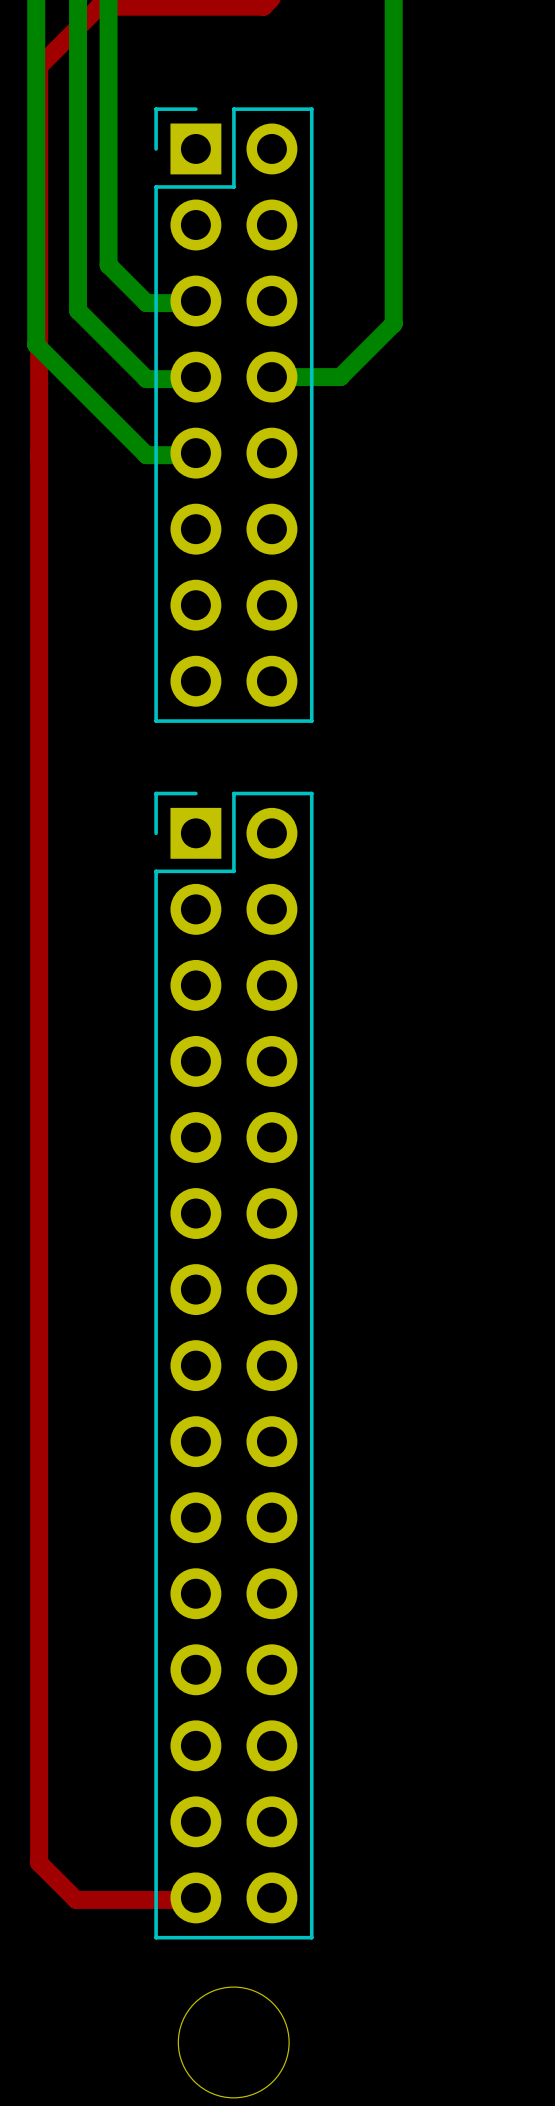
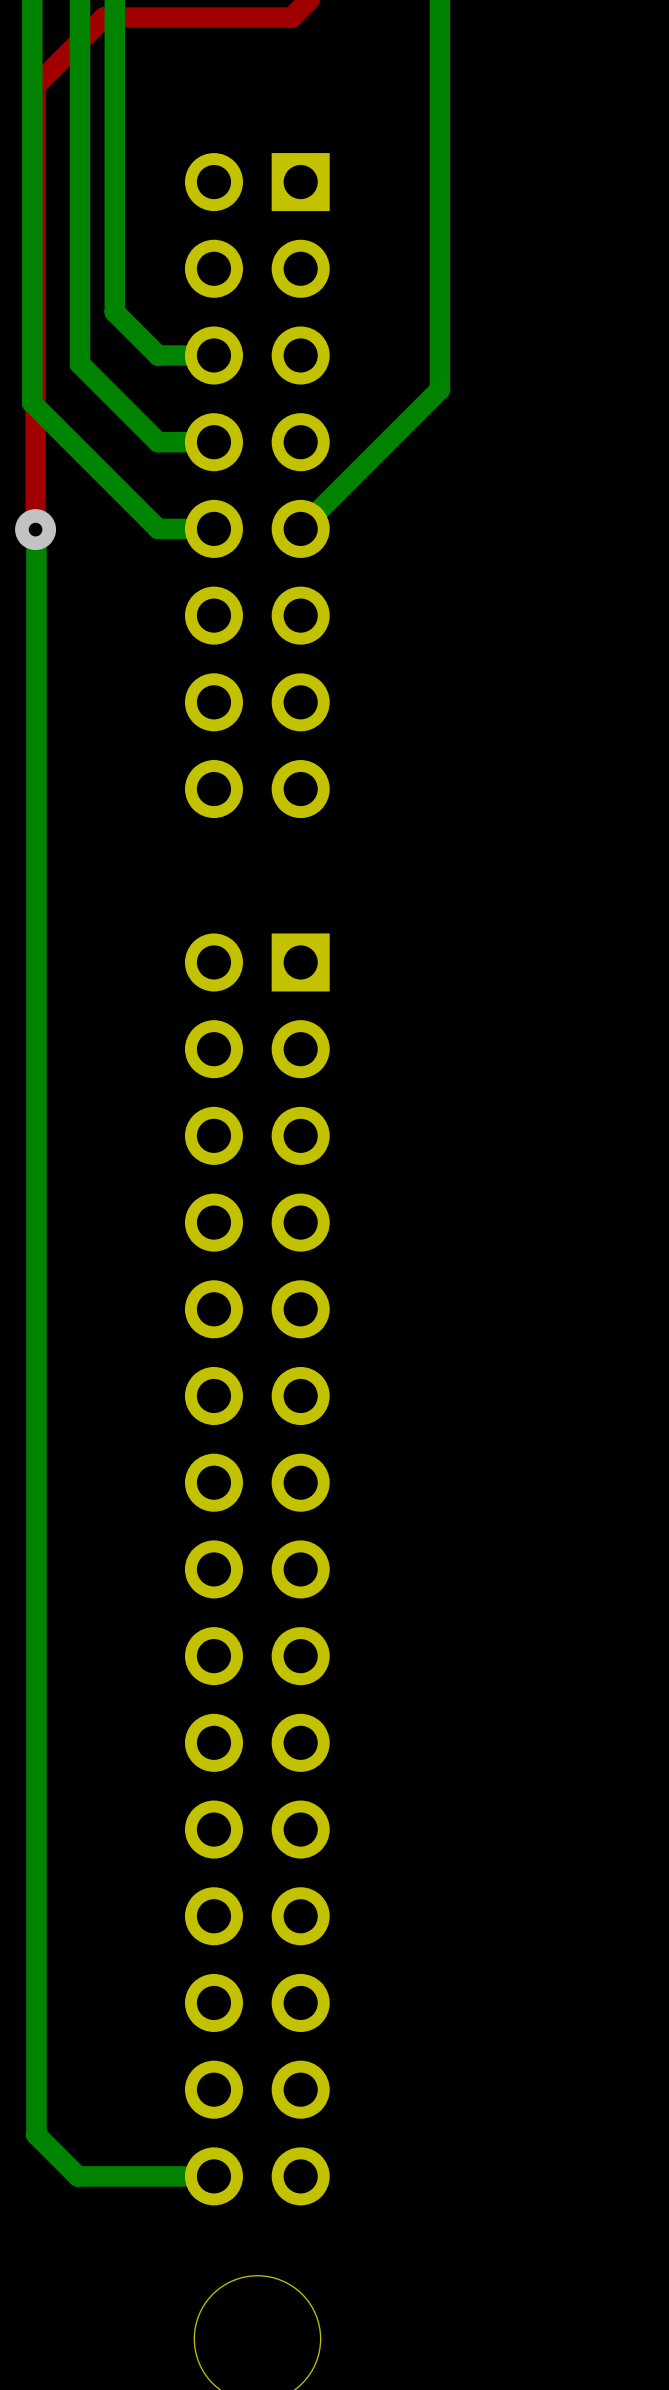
bottom track: (393, 323) (340, 377) (271, 377) -> (439, 379) (439, 389) (300, 528)
part side: bottom (233, 415) -> top (257, 485)
top track: (39, 455) (39, 1862) (76, 1899) (195, 1899) -> none
bottom track: none -> (35, 529) (36, 2134) (77, 2176) (213, 2176)
via: none -> (35, 529)
part side: bottom (233, 1365) -> top (257, 1569)

